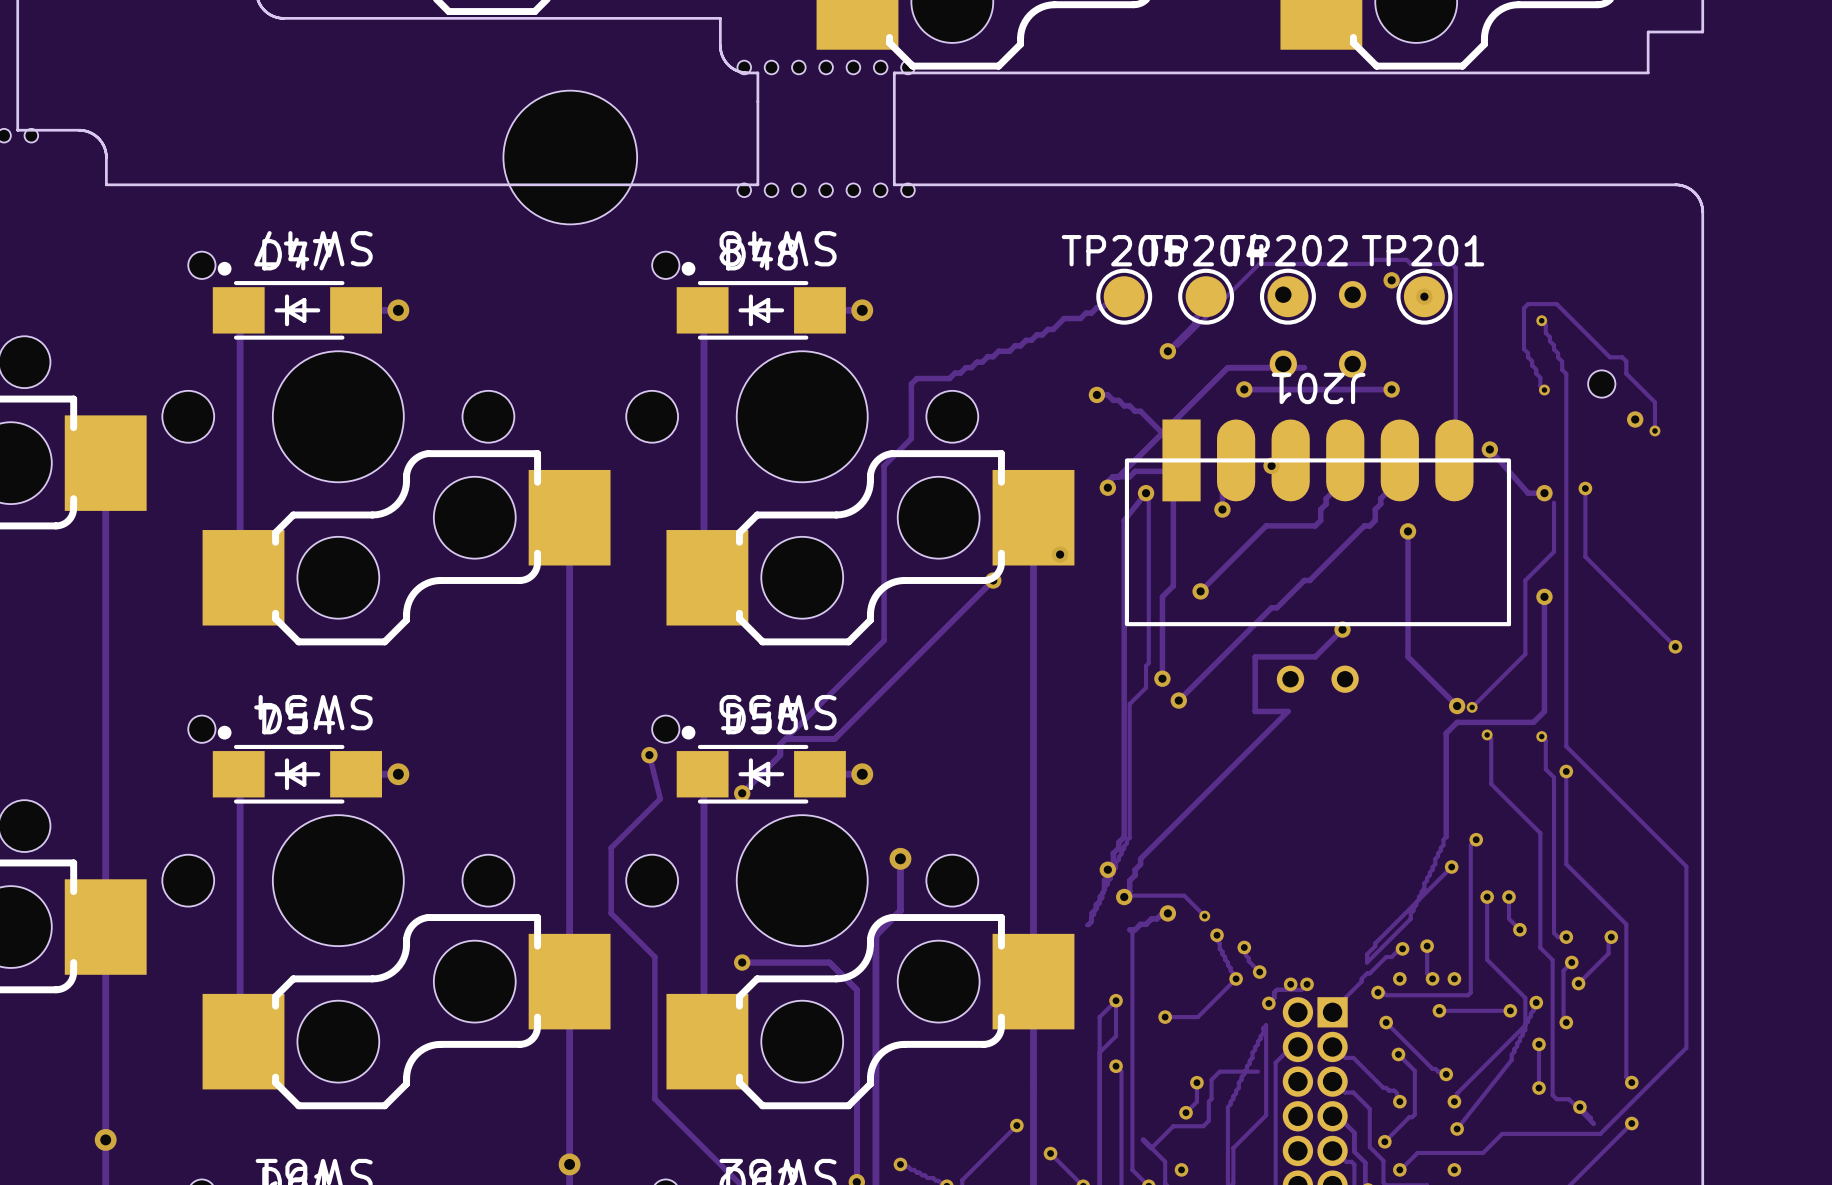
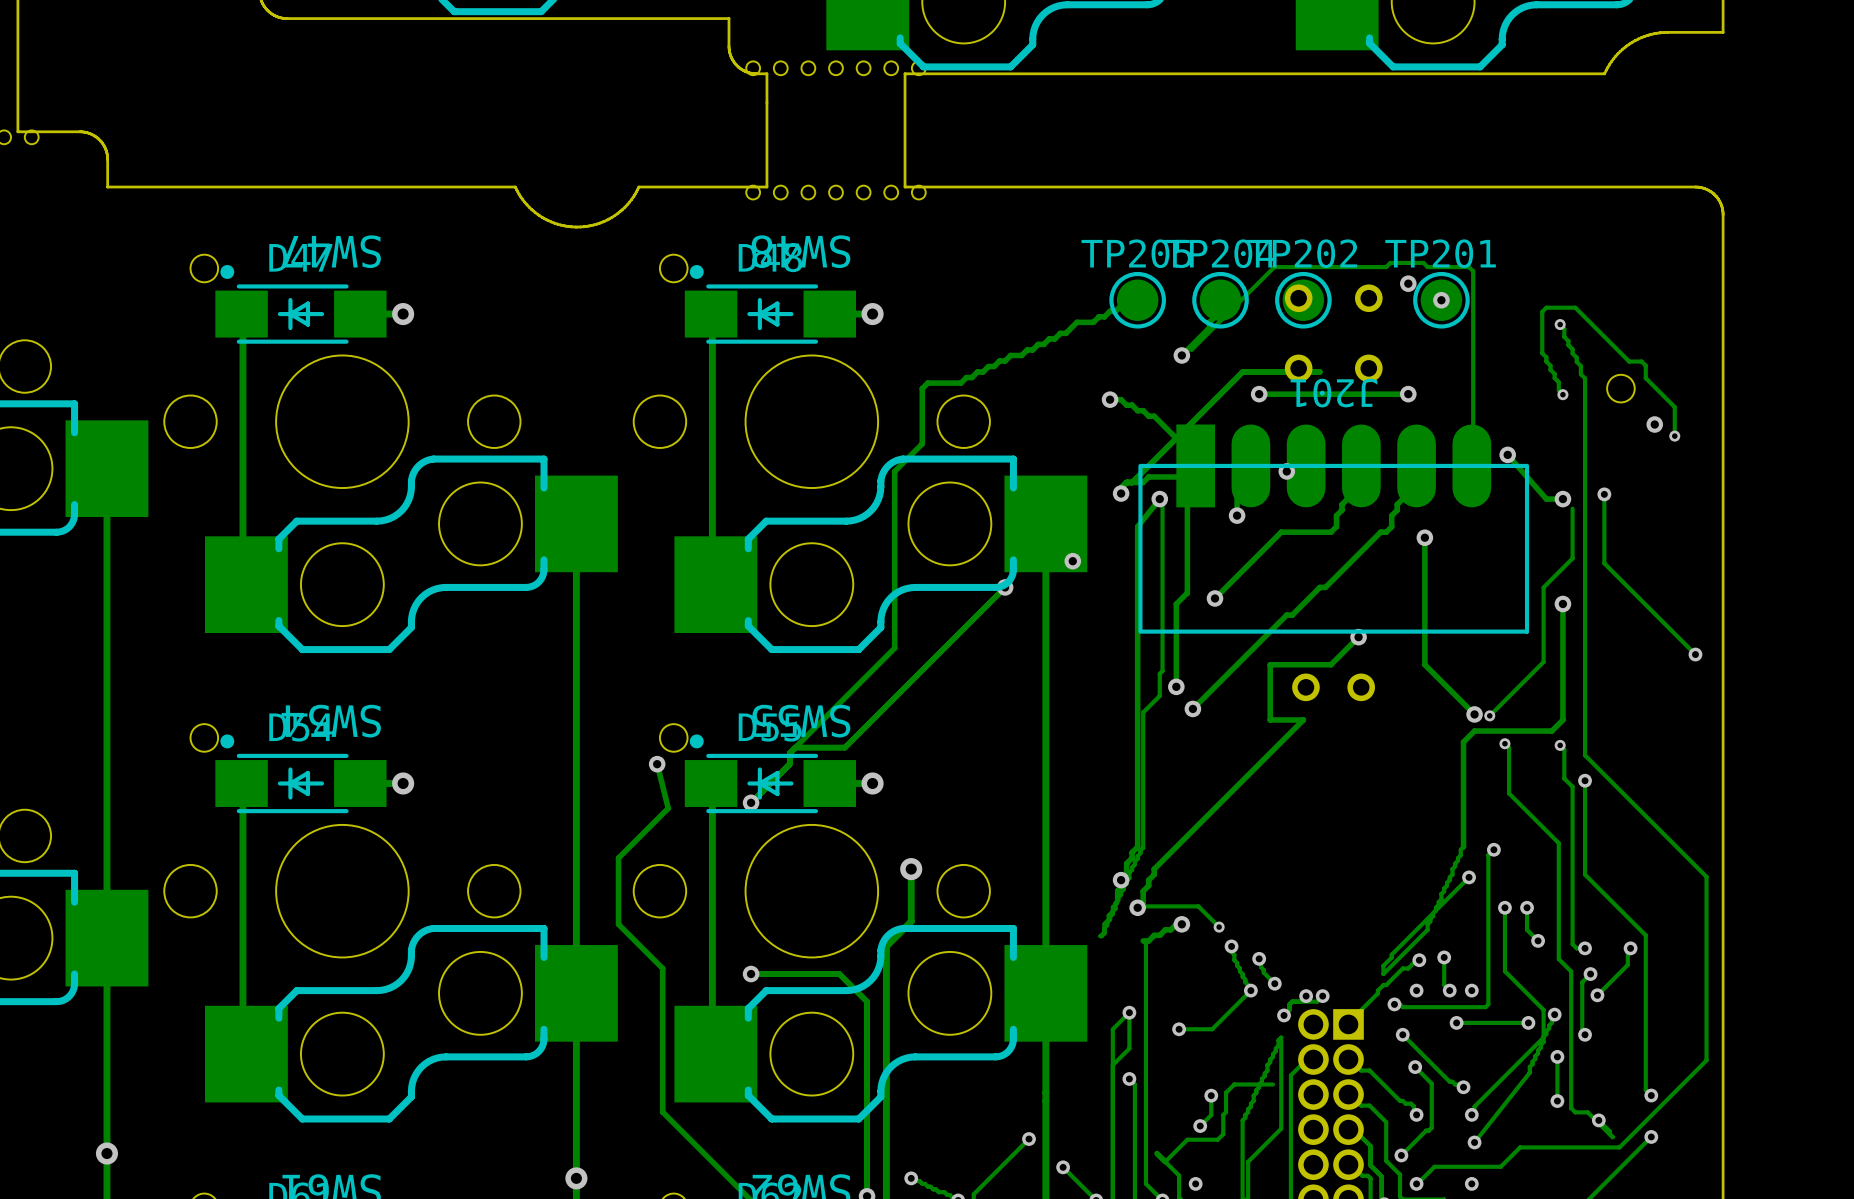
board edge: (1648, 32) (1648, 72) (1585, 72) -> (1667, 32) (1647, 35) (1629, 44) (1615, 56) (1604, 73)
part: (570, 157) -> none
board edge: (631, 184) (509, 184) -> (638, 187) (629, 202) (614, 215) (596, 224) (577, 227) (557, 224) (539, 215) (524, 202) (515, 187)

